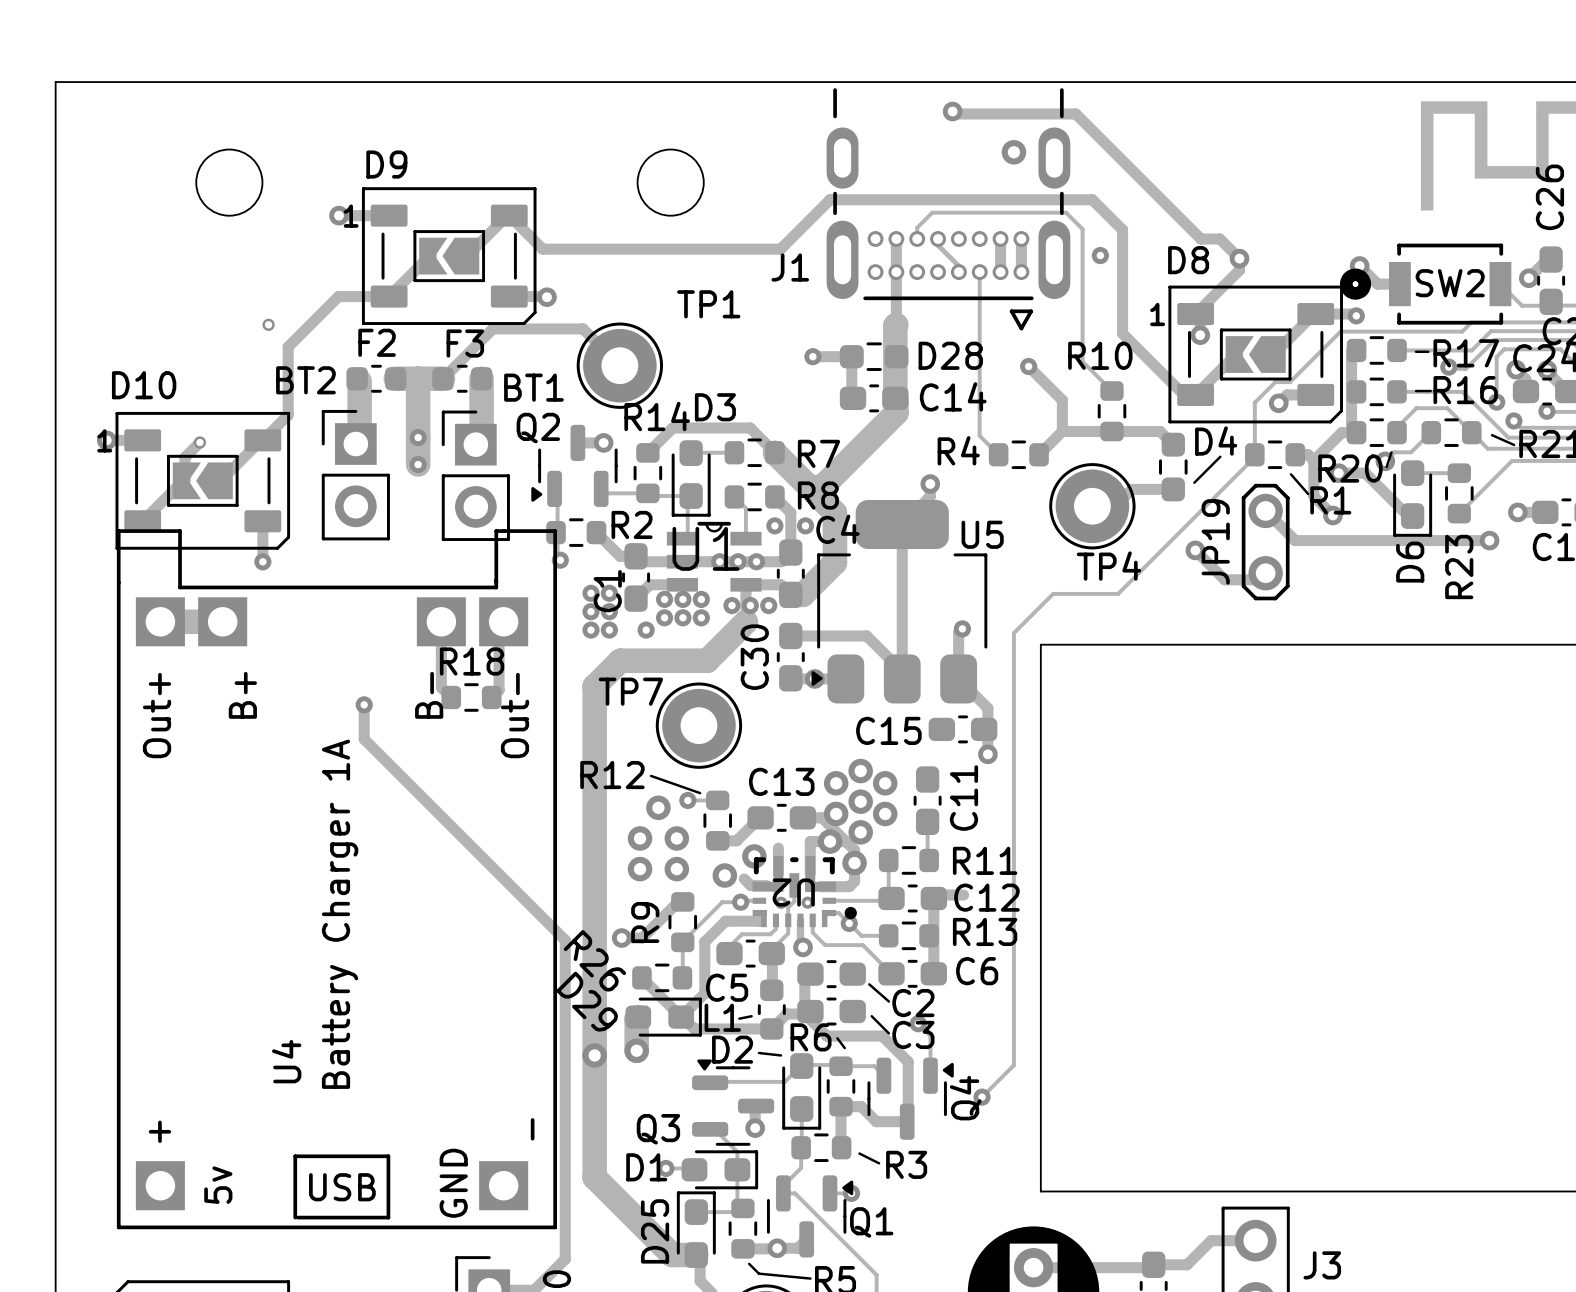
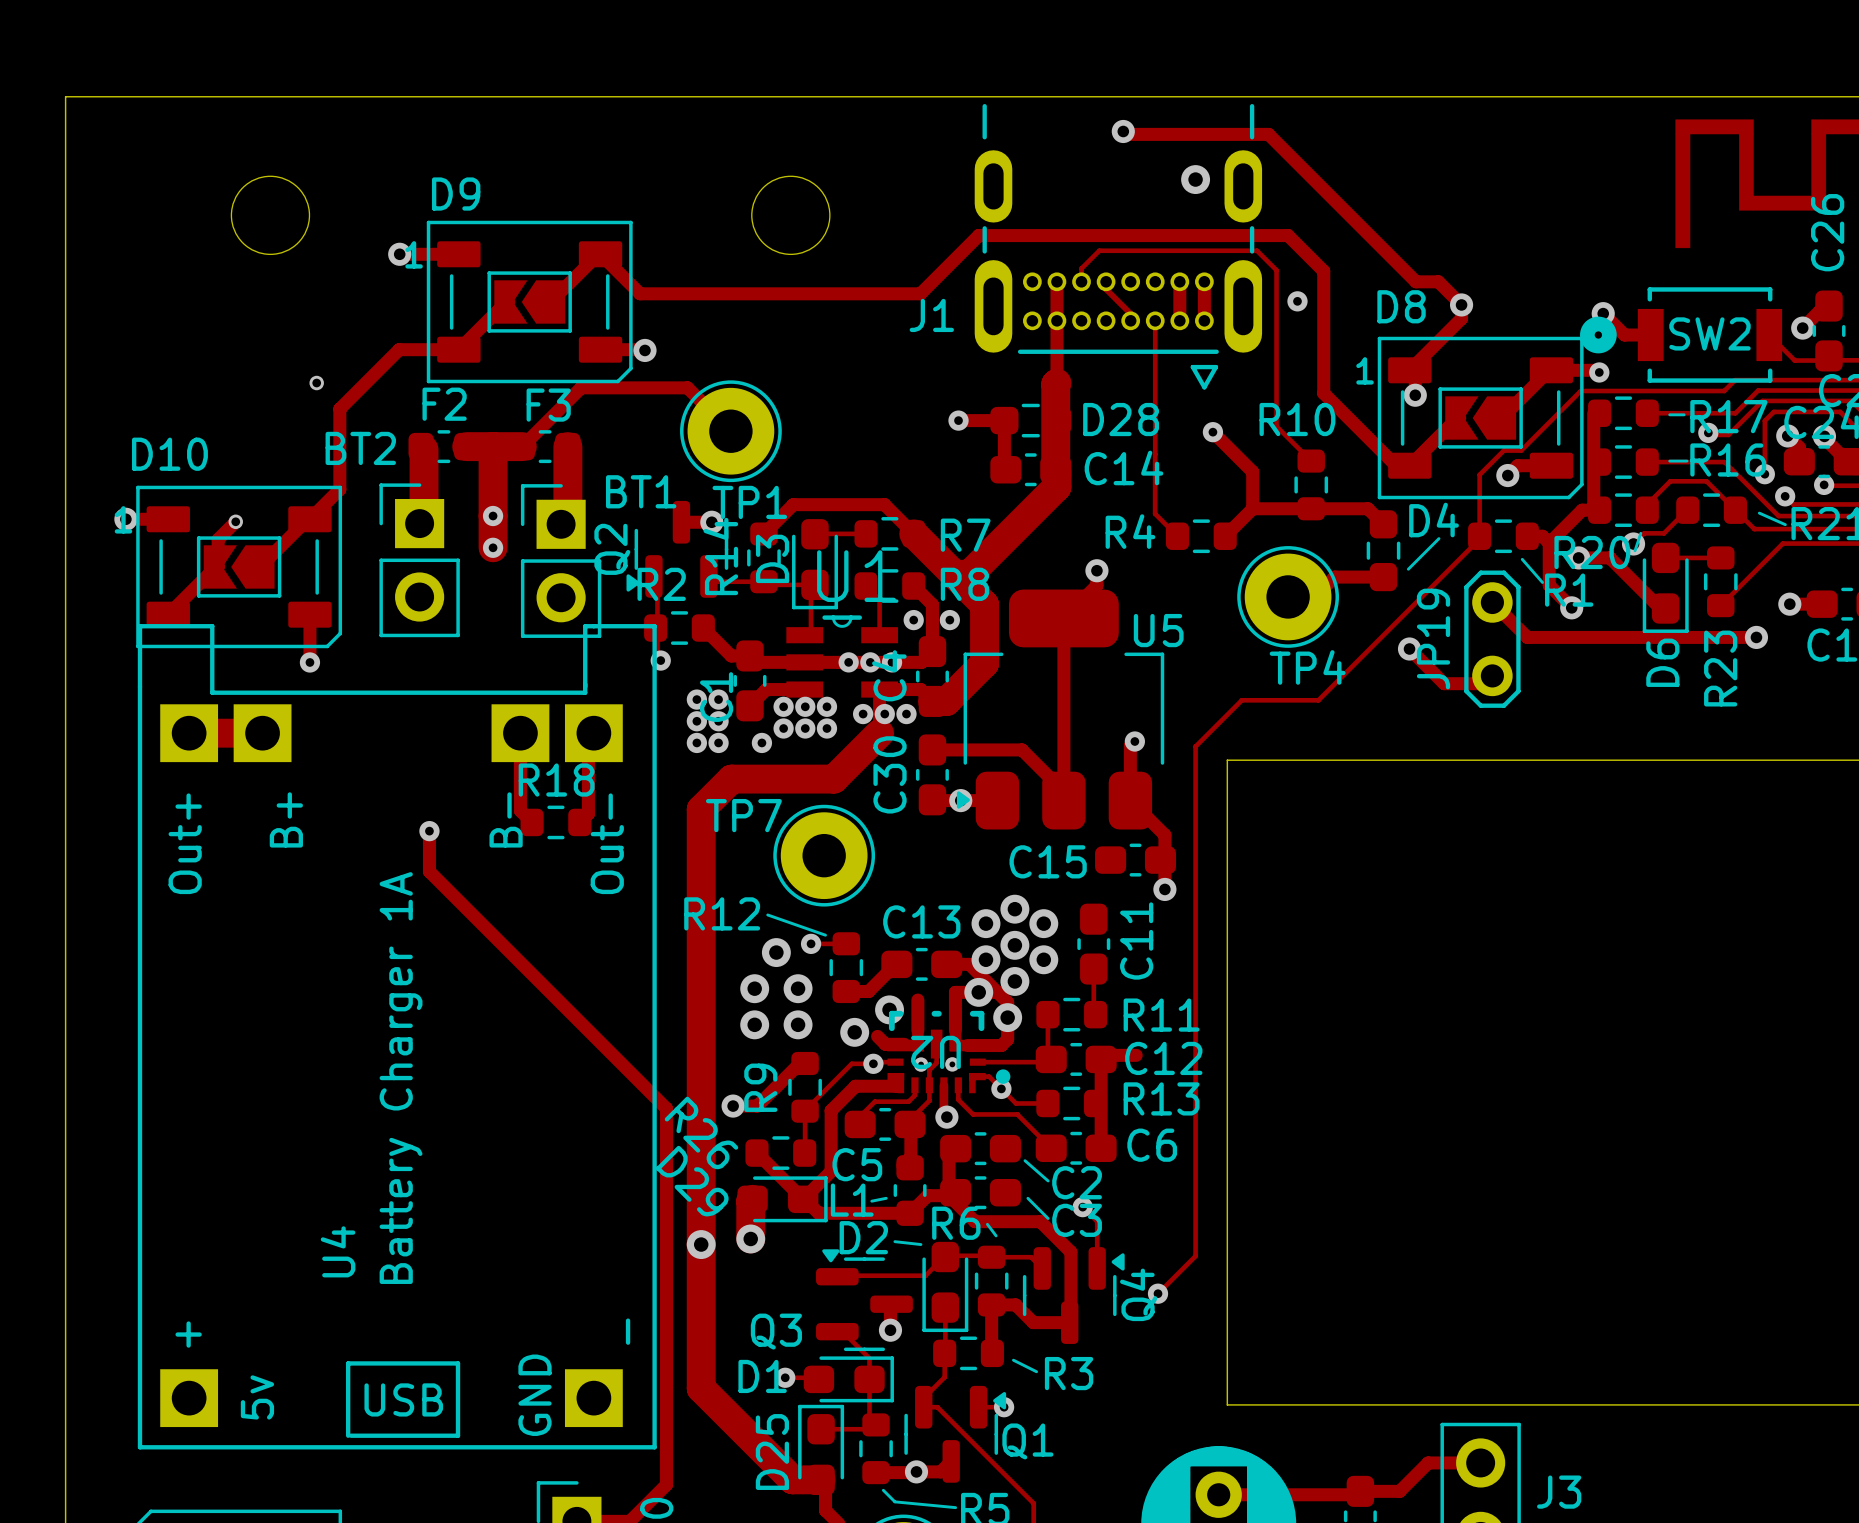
TP1 name position: TP1 (708, 304) -> TP1 (749, 502)
BT1 name position: BT1 (533, 387) -> BT1 (641, 491)
D3 name rotation: 0° (715, 407) -> 90° counterclockwise (772, 558)
D3 name position: D3 (715, 407) -> D3 (772, 558)
R14 name rotation: 0° (657, 416) -> 90° counterclockwise (720, 556)
Q2 name rotation: 0° (538, 428) -> 90° counterclockwise (612, 549)
R2 name position: R2 (632, 524) -> R2 (661, 584)
C4 name rotation: 0° (837, 529) -> 90° counterclockwise (889, 675)
C4 name position: C4 (837, 529) -> C4 (889, 675)
U1 name position: U1 (705, 548) -> U1 (856, 576)

